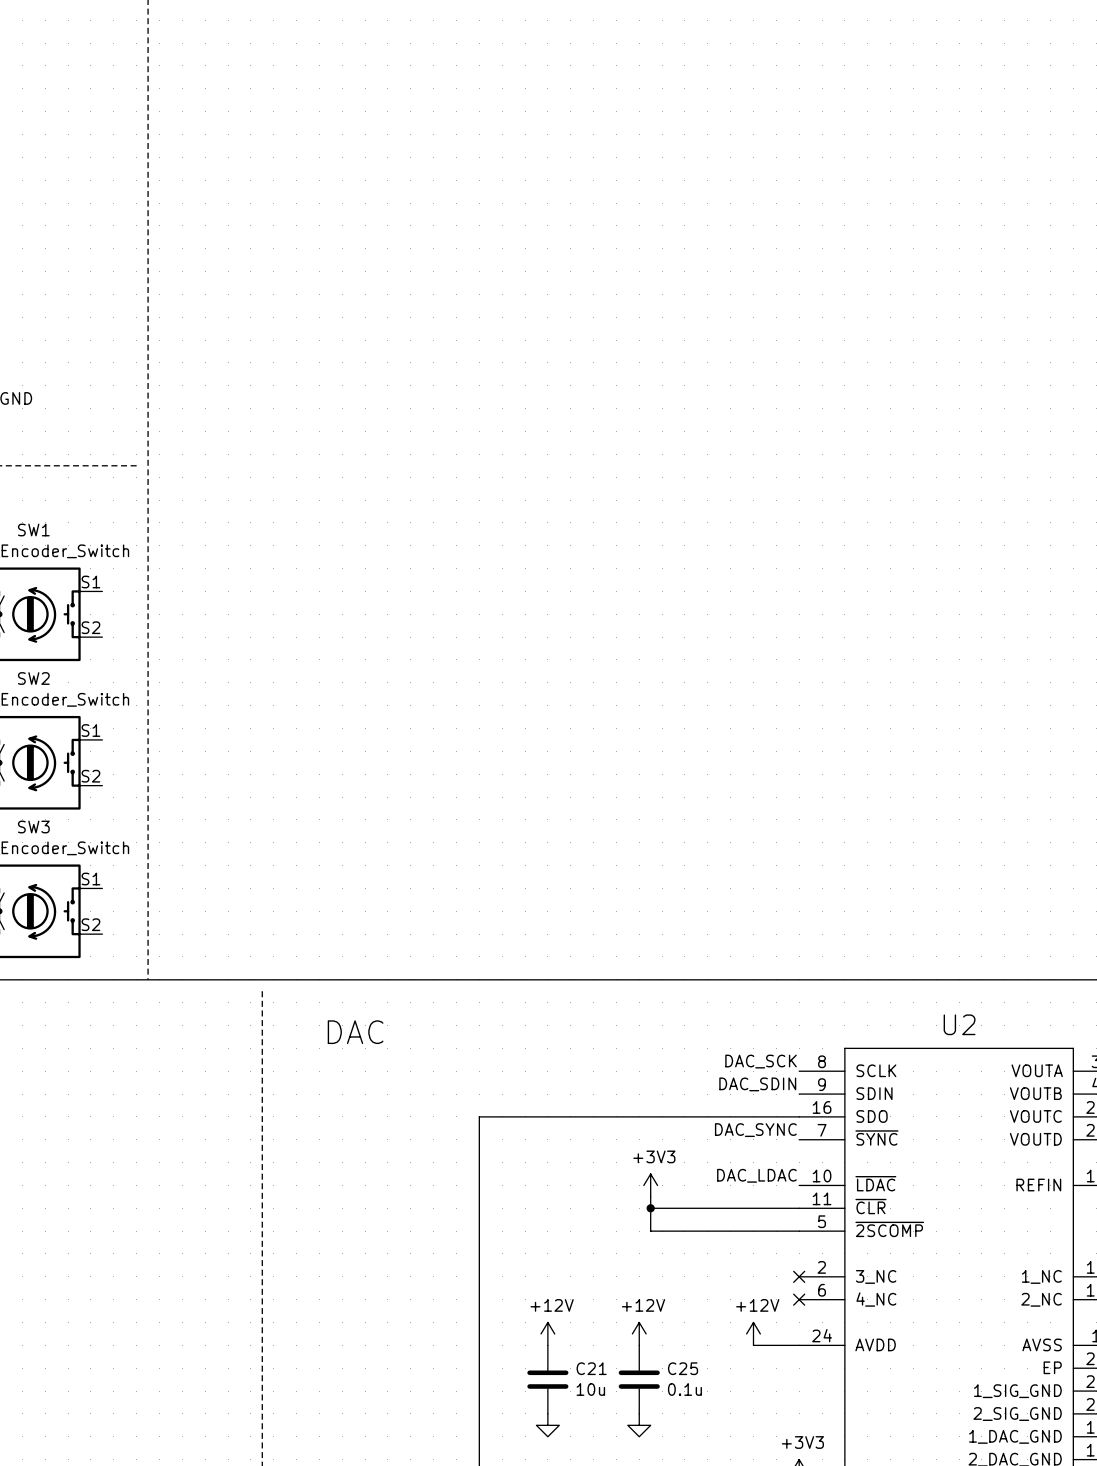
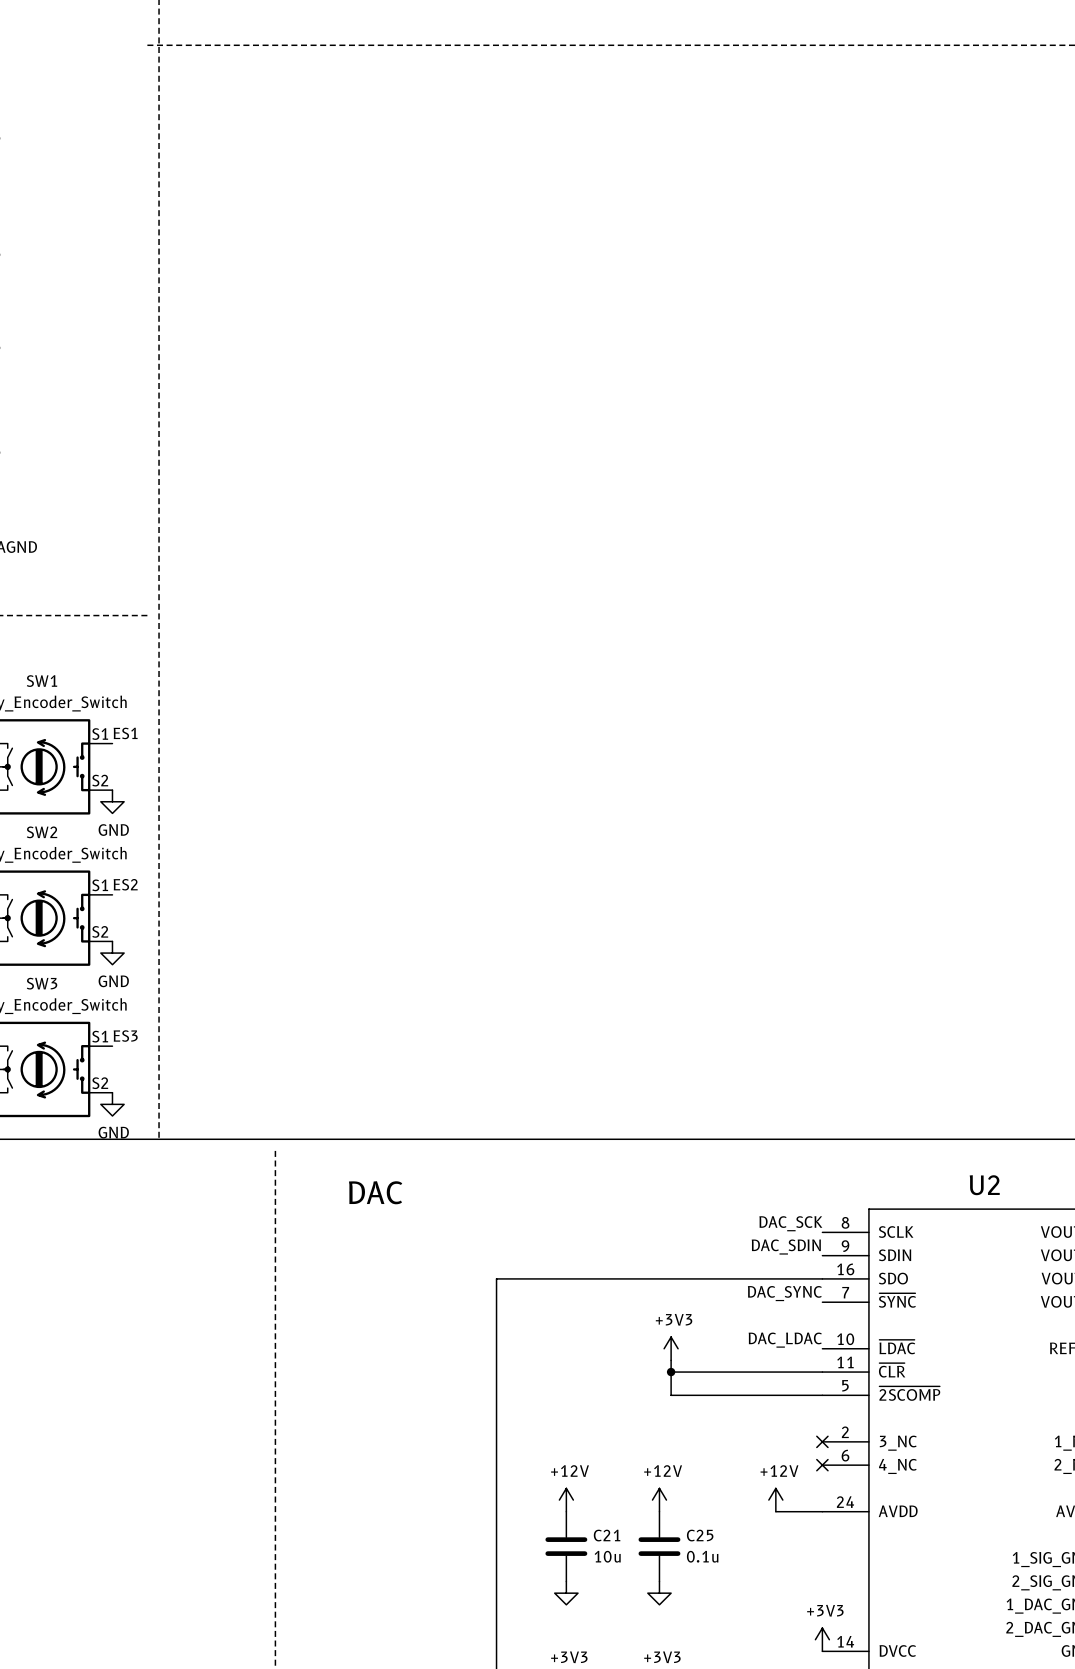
label: none -> ES1 (125, 733)
power symbol: none -> GND (112, 801)
label: none -> ES2 (125, 884)
power symbol: none -> GND (112, 953)
label: none -> ES3 (125, 1036)
power symbol: none -> GND (112, 1104)

